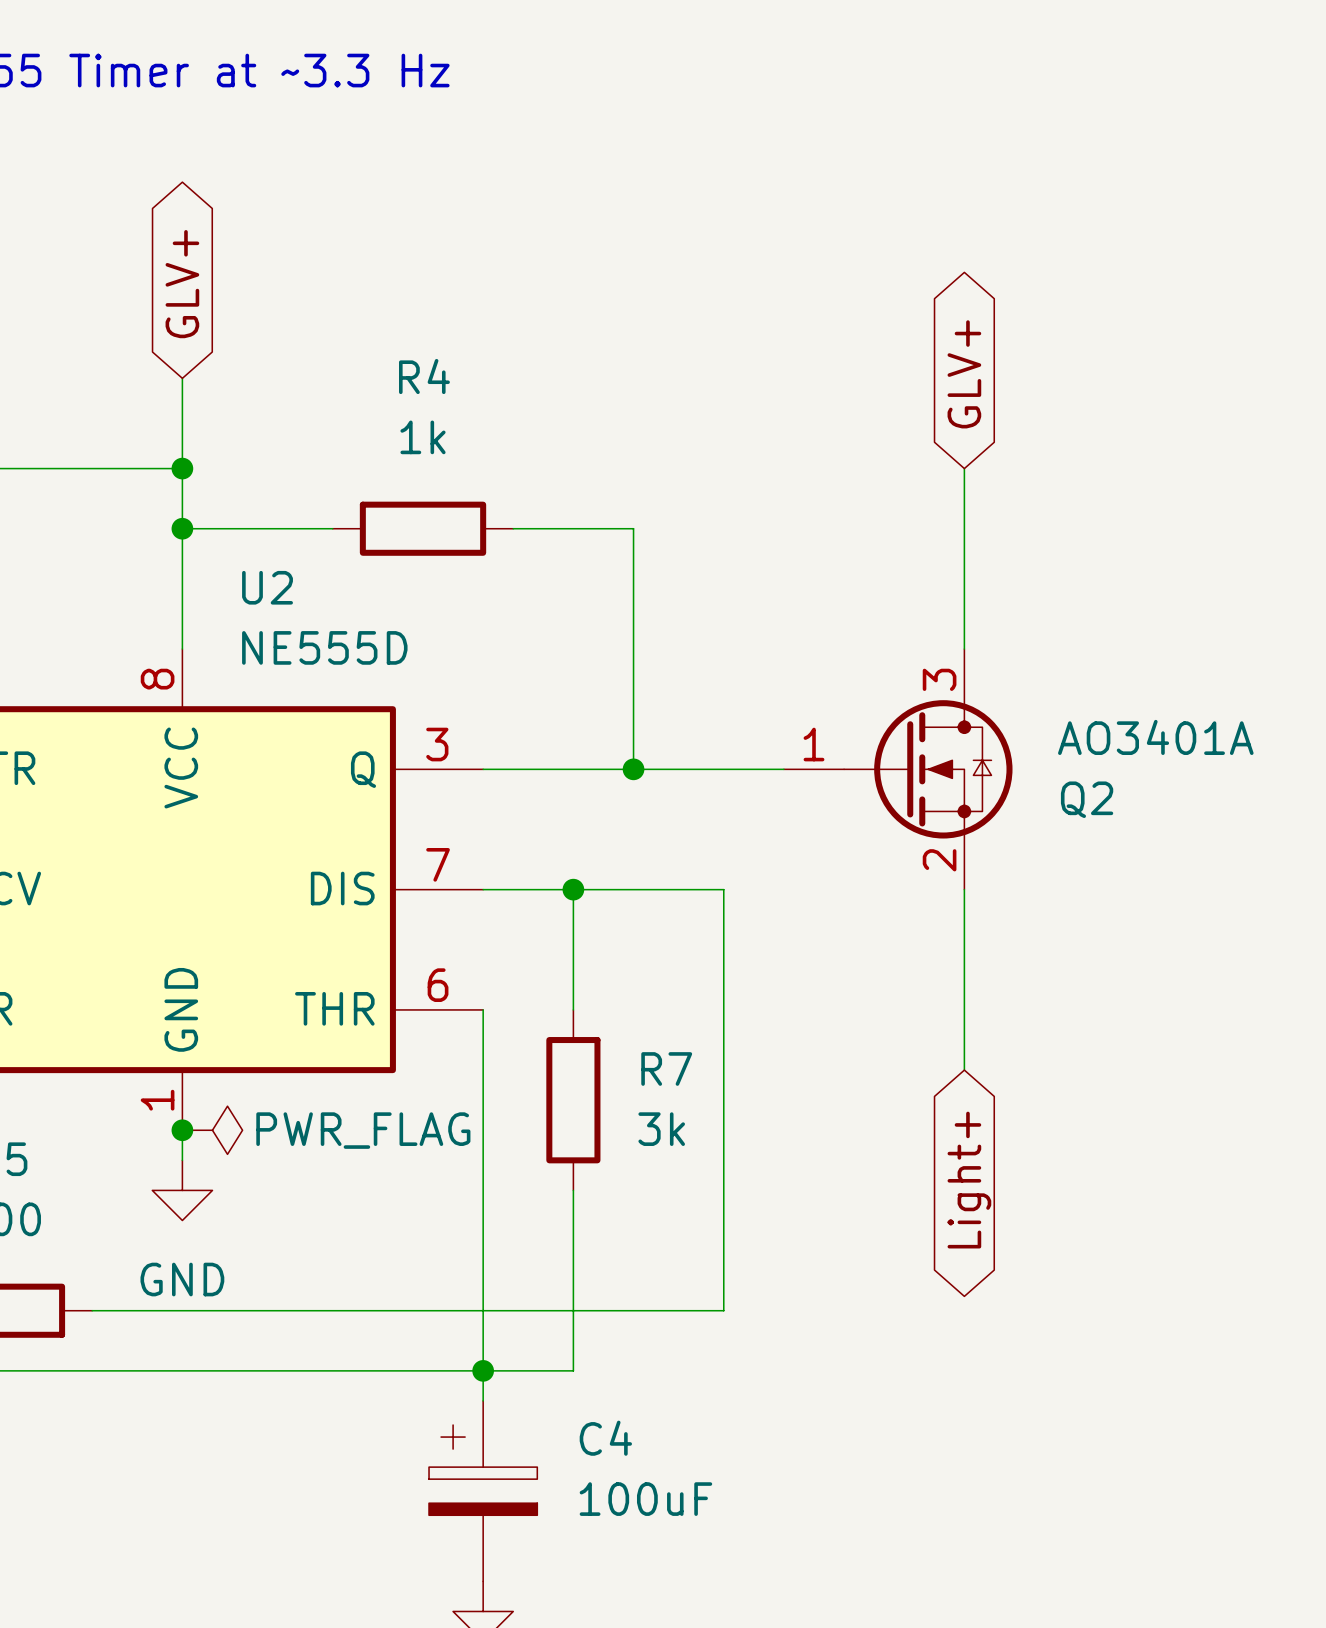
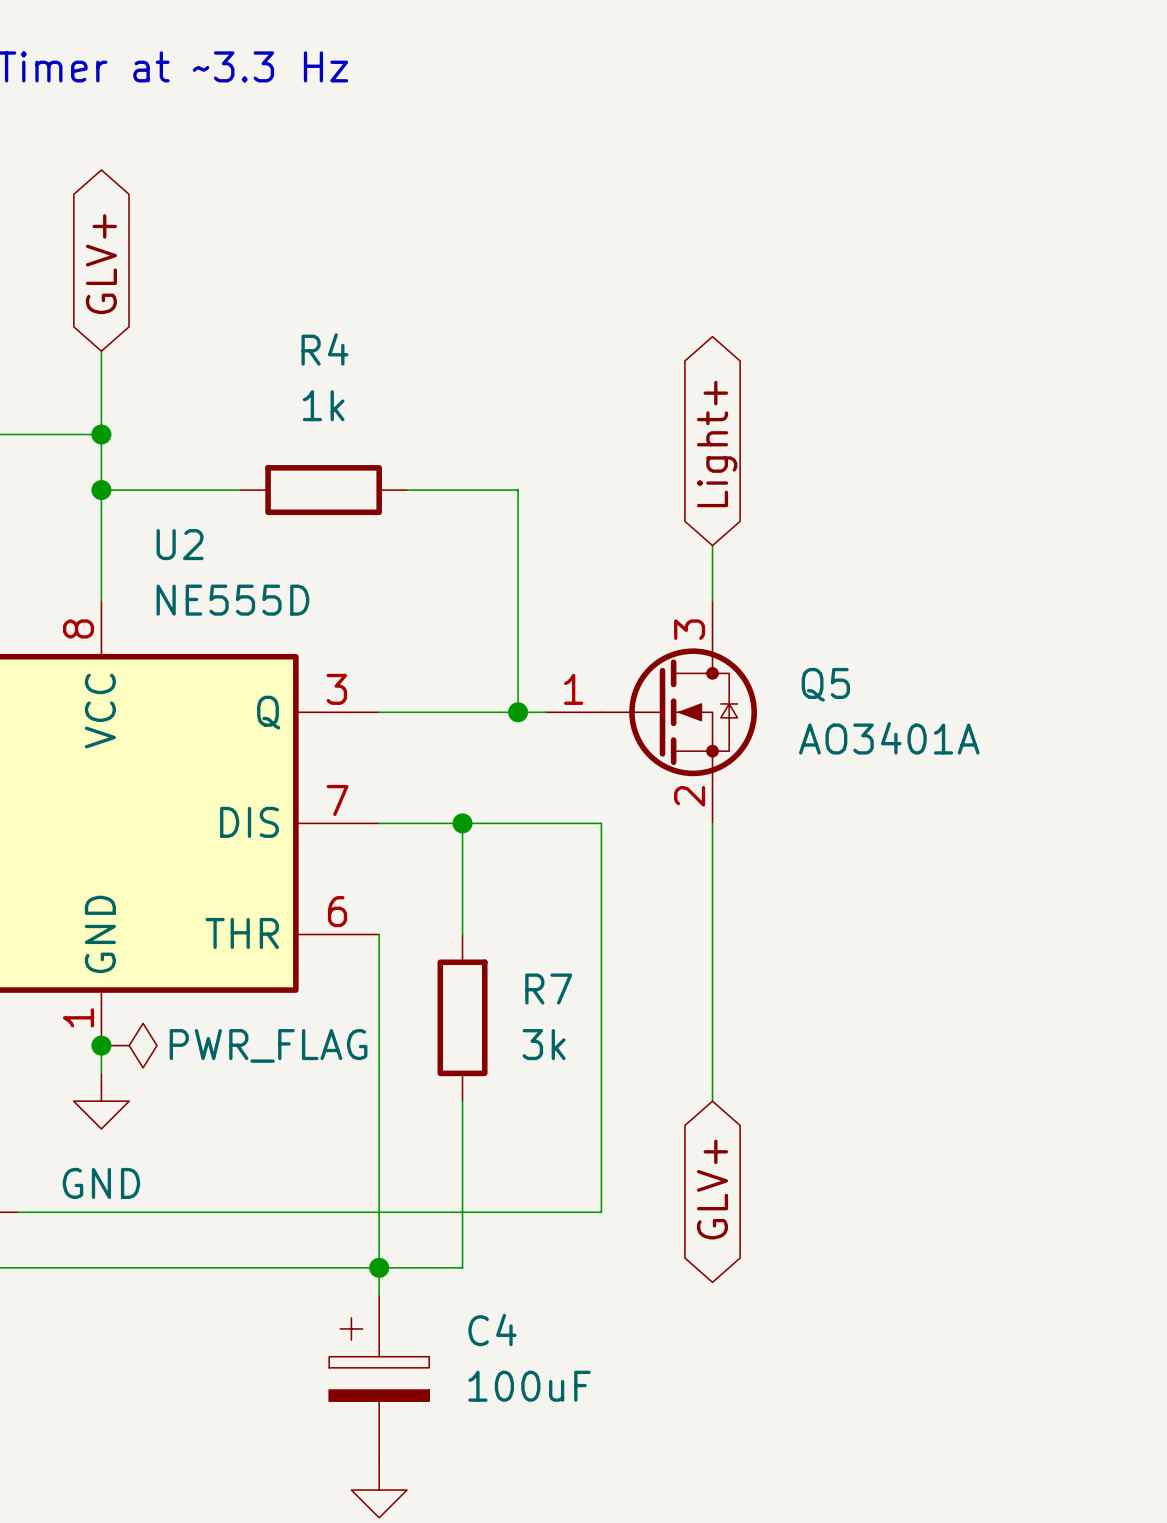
global label: GLV+ (964, 374) -> none
wire: (964, 468) (964, 649) -> none
wire: none -> (712, 545) (712, 601)
Q5: none -> AO3401A (651, 712)
Q2: AO3401A (898, 769) -> none
wire: none -> (712, 823) (712, 1101)
wire: (964, 889) (964, 1070) -> none
global label rotation: 0° (969, 1180) -> 180° (717, 444)
global label position: Light+ (969, 1180) -> Light+ (717, 444)
global label: none -> GLV+ (712, 1189)

